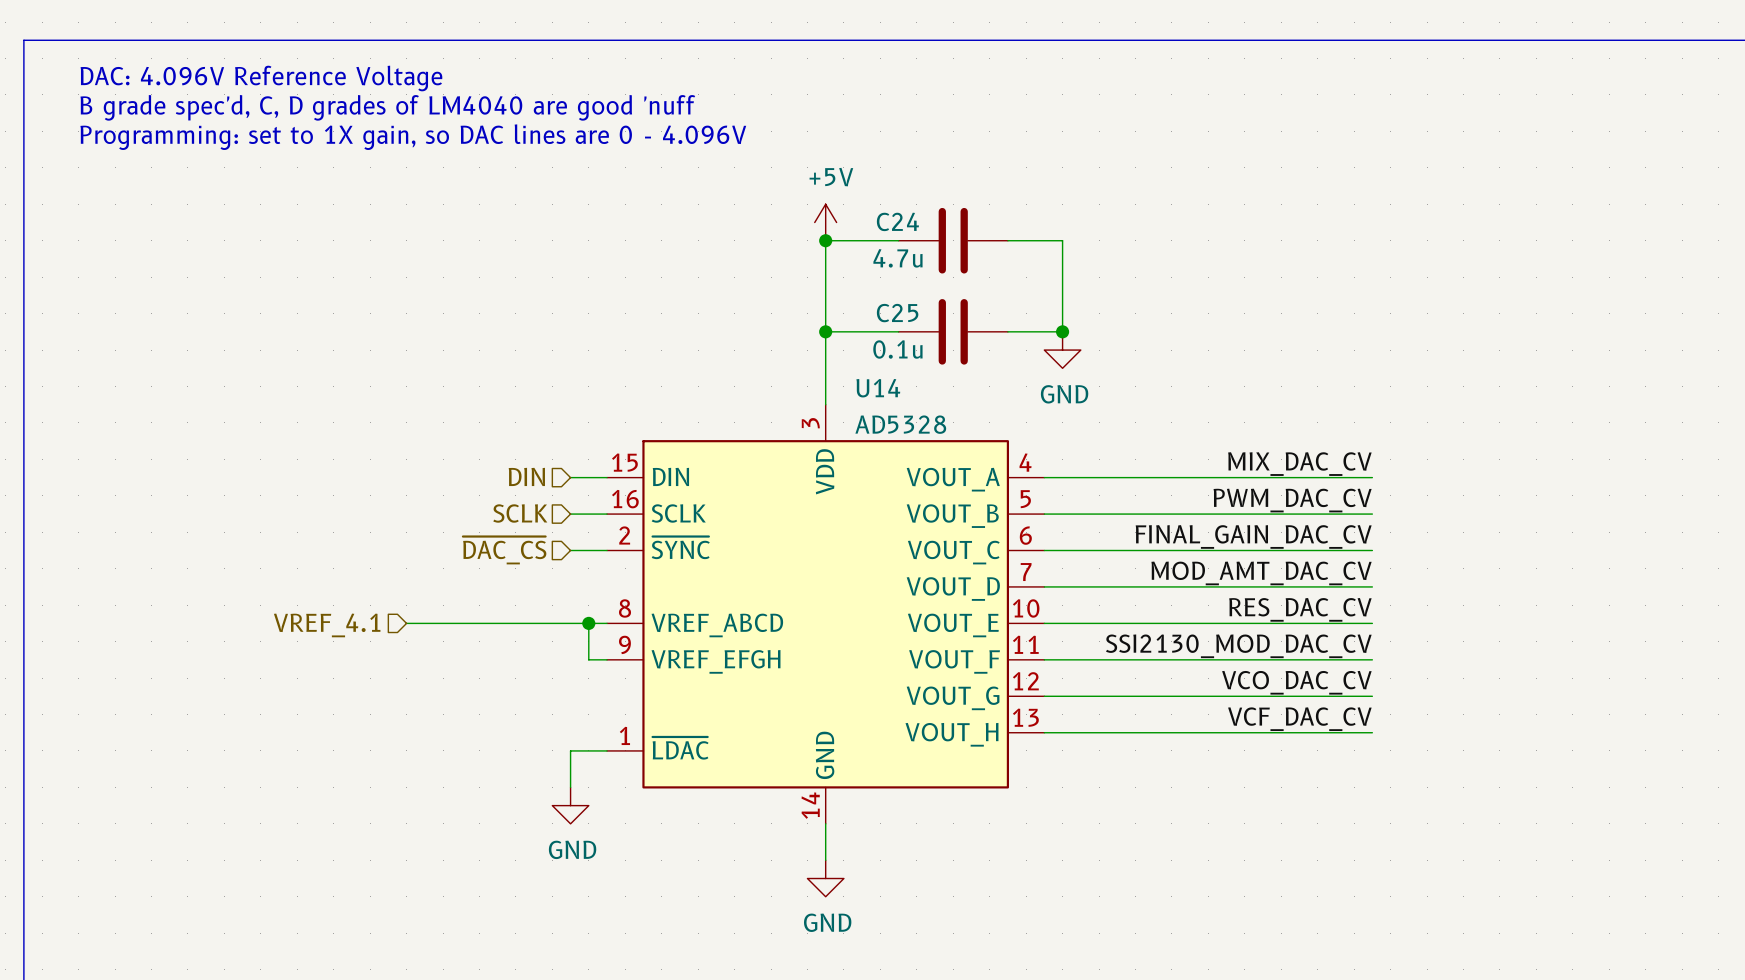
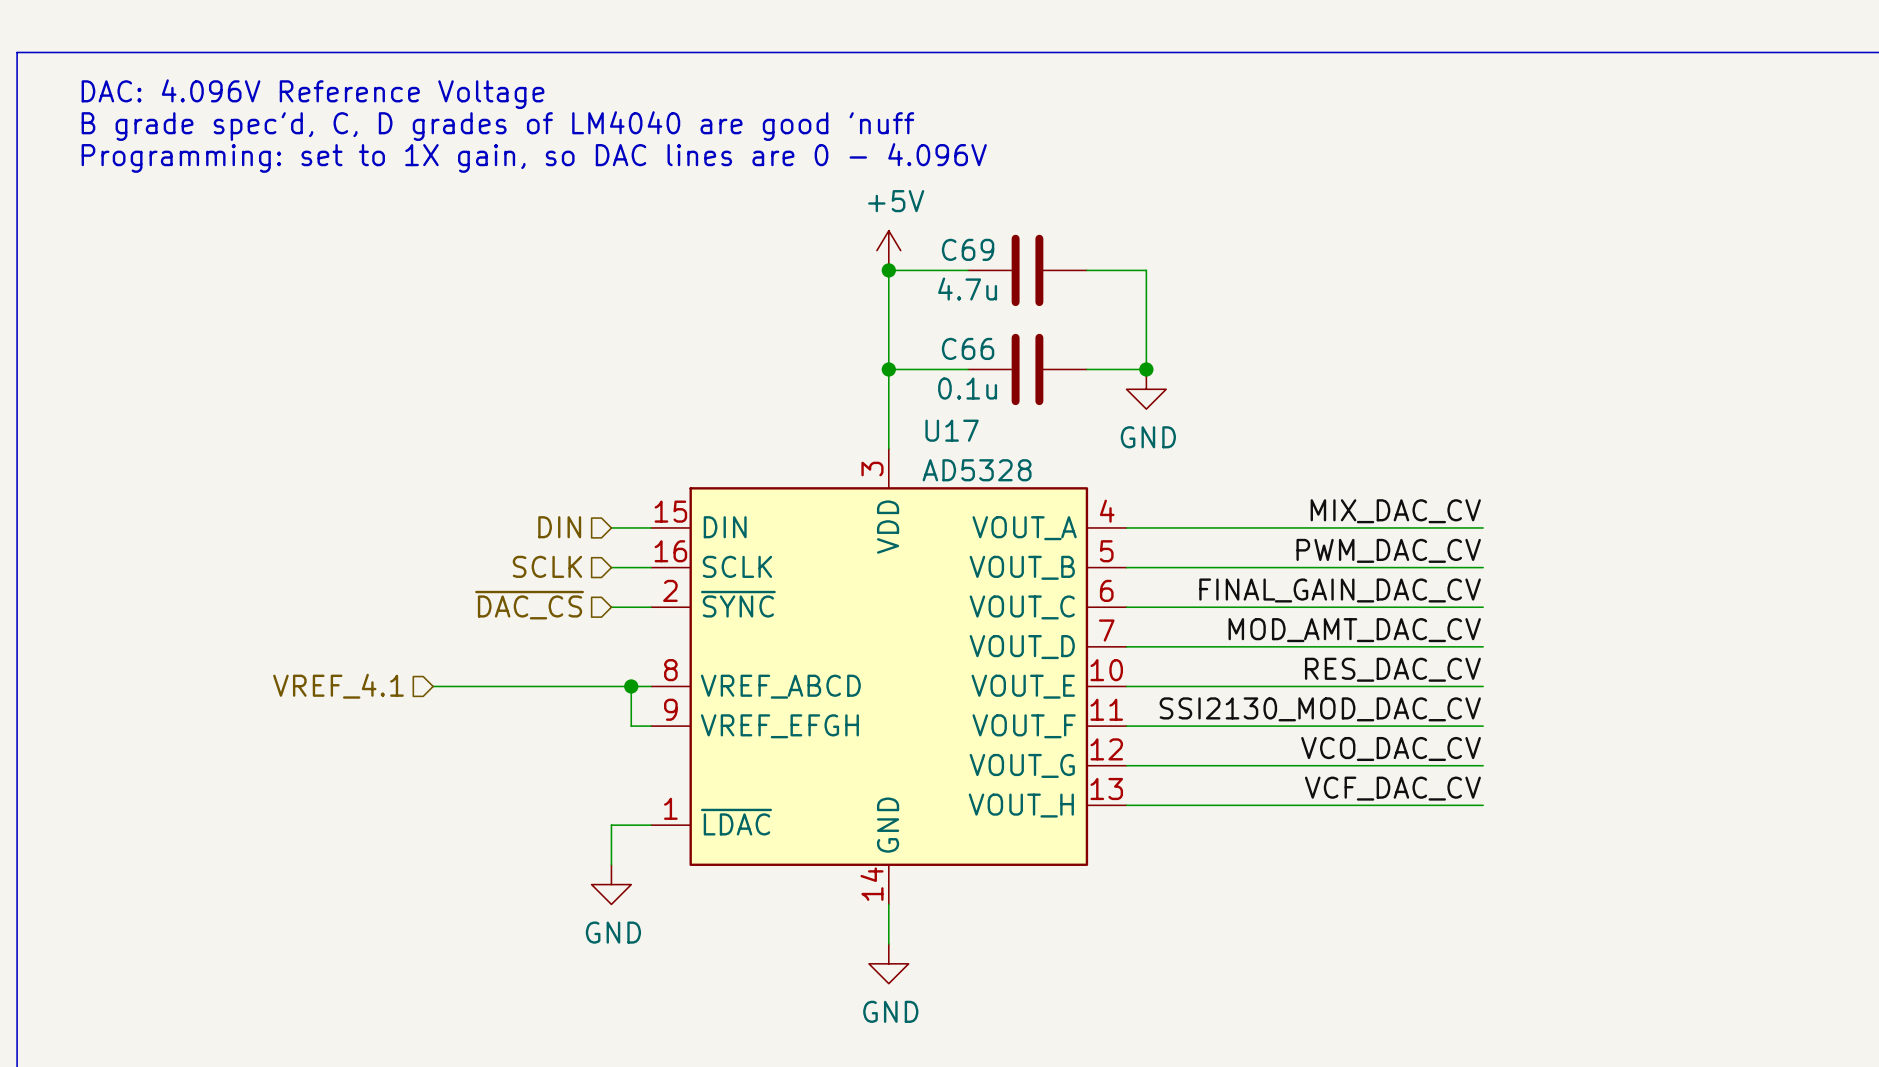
C24 name: C24 (897, 221) -> C69 (968, 249)
C25 name: C25 (897, 313) -> C66 (968, 348)
U14 name: U14 (878, 388) -> U17 (952, 430)

